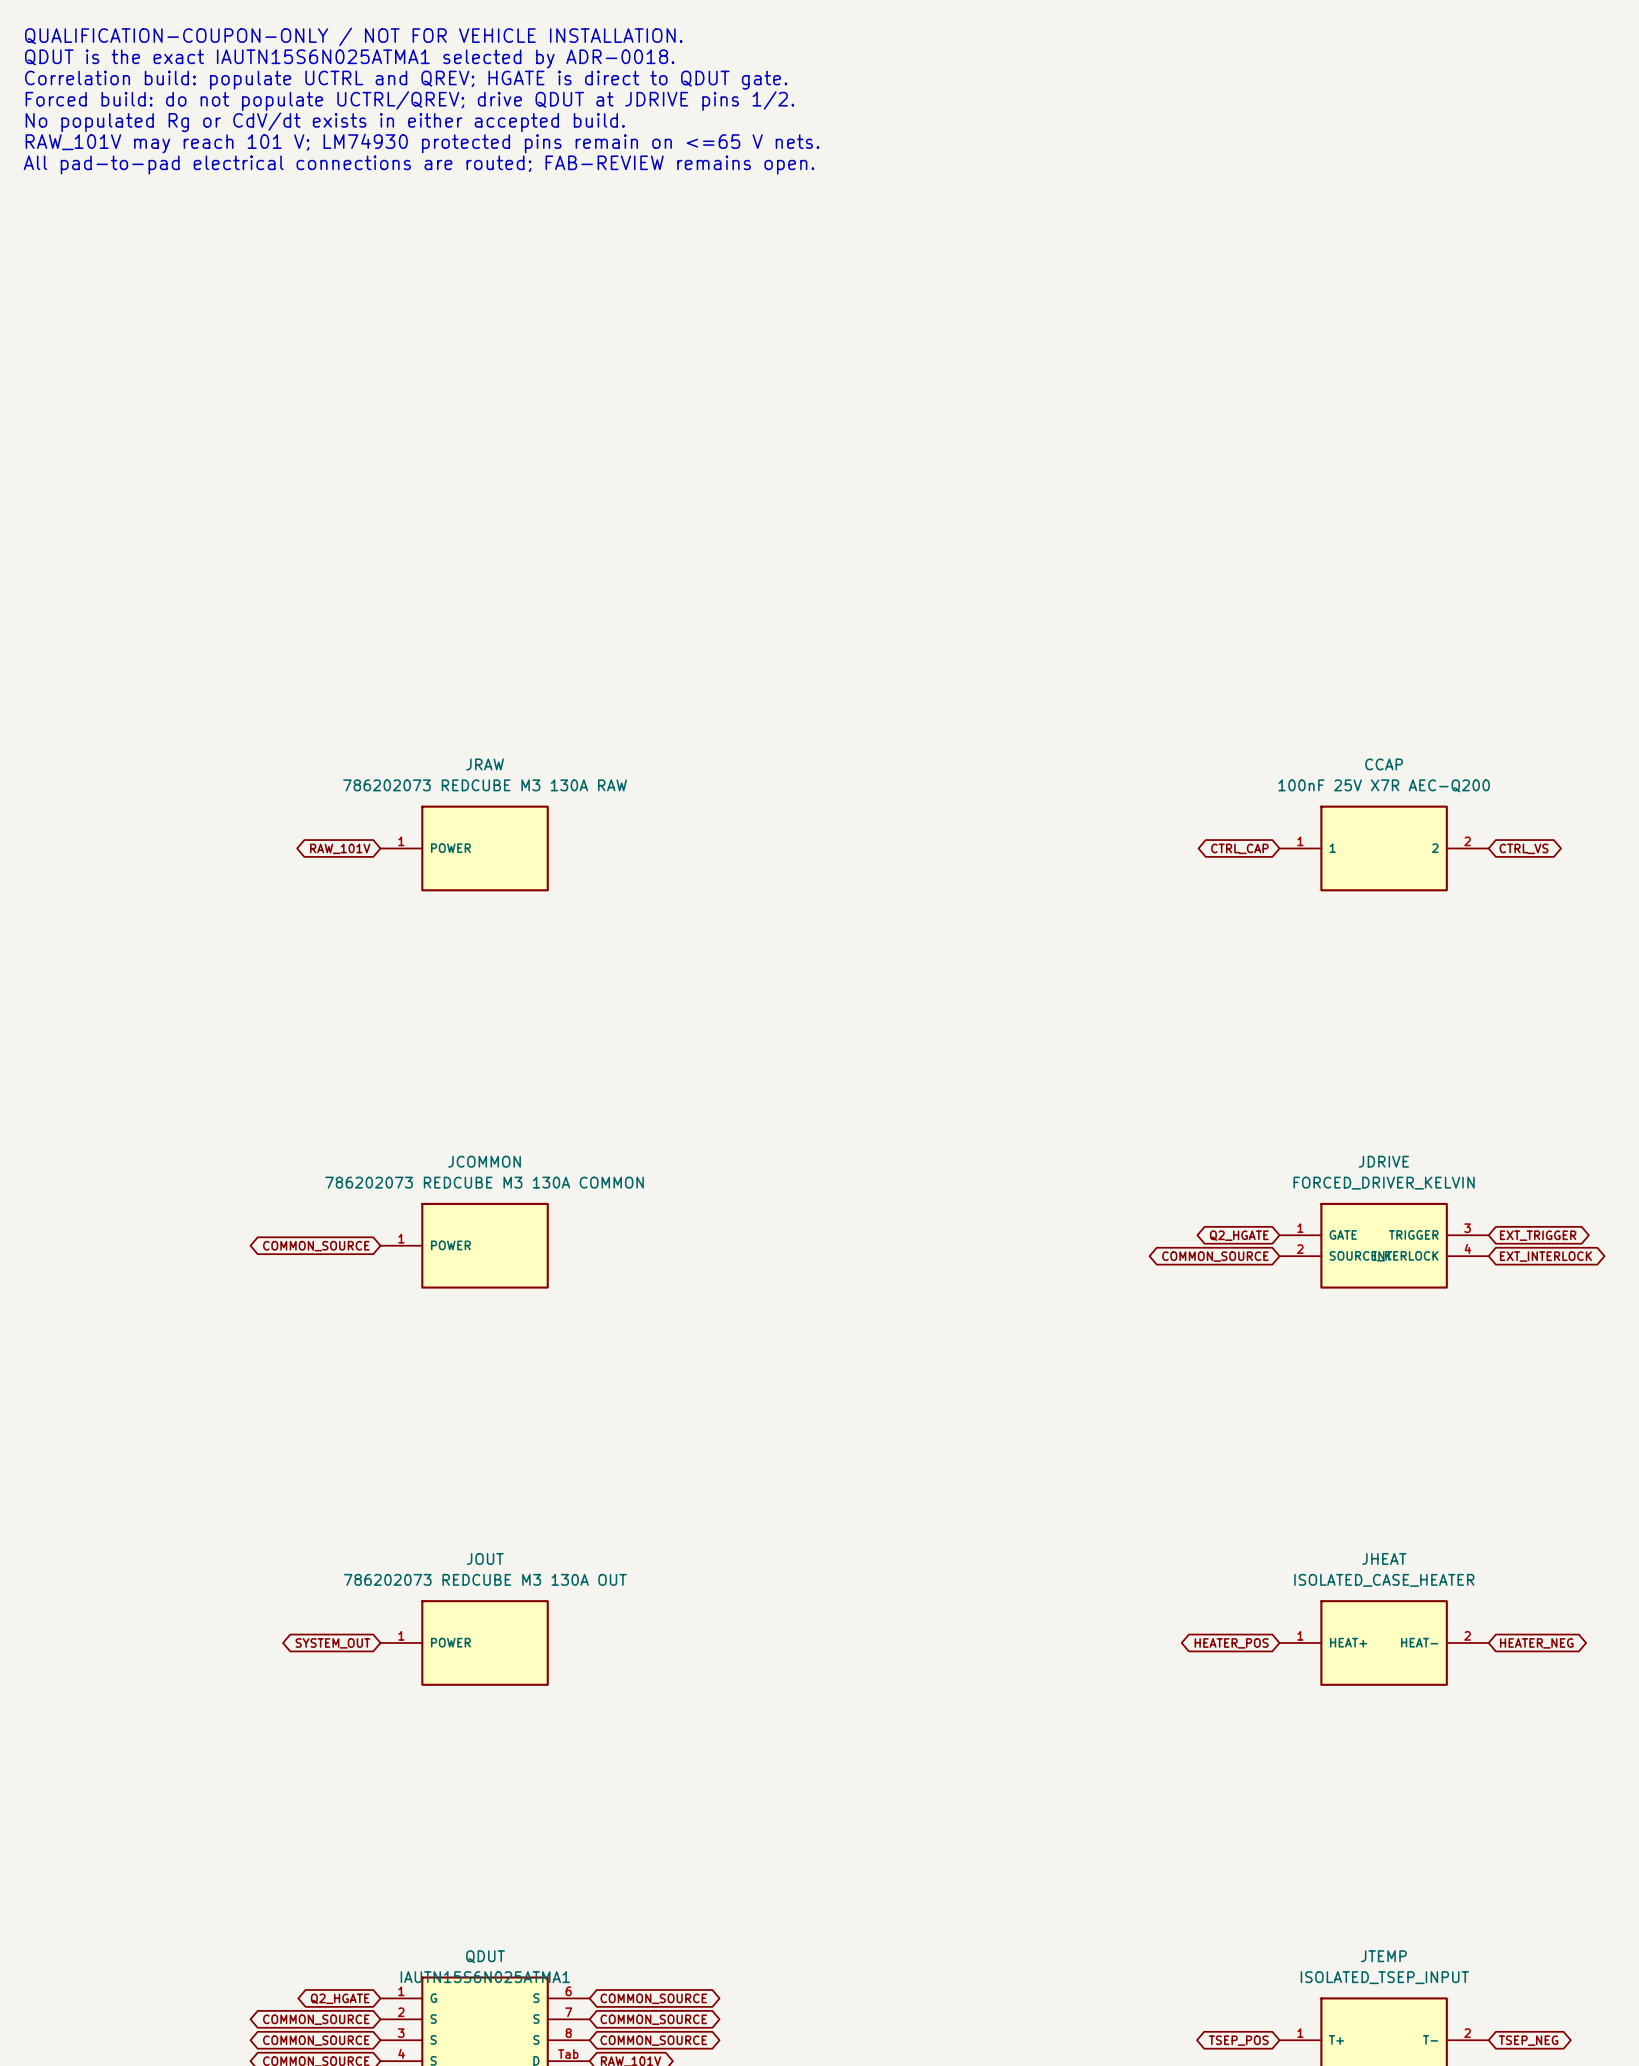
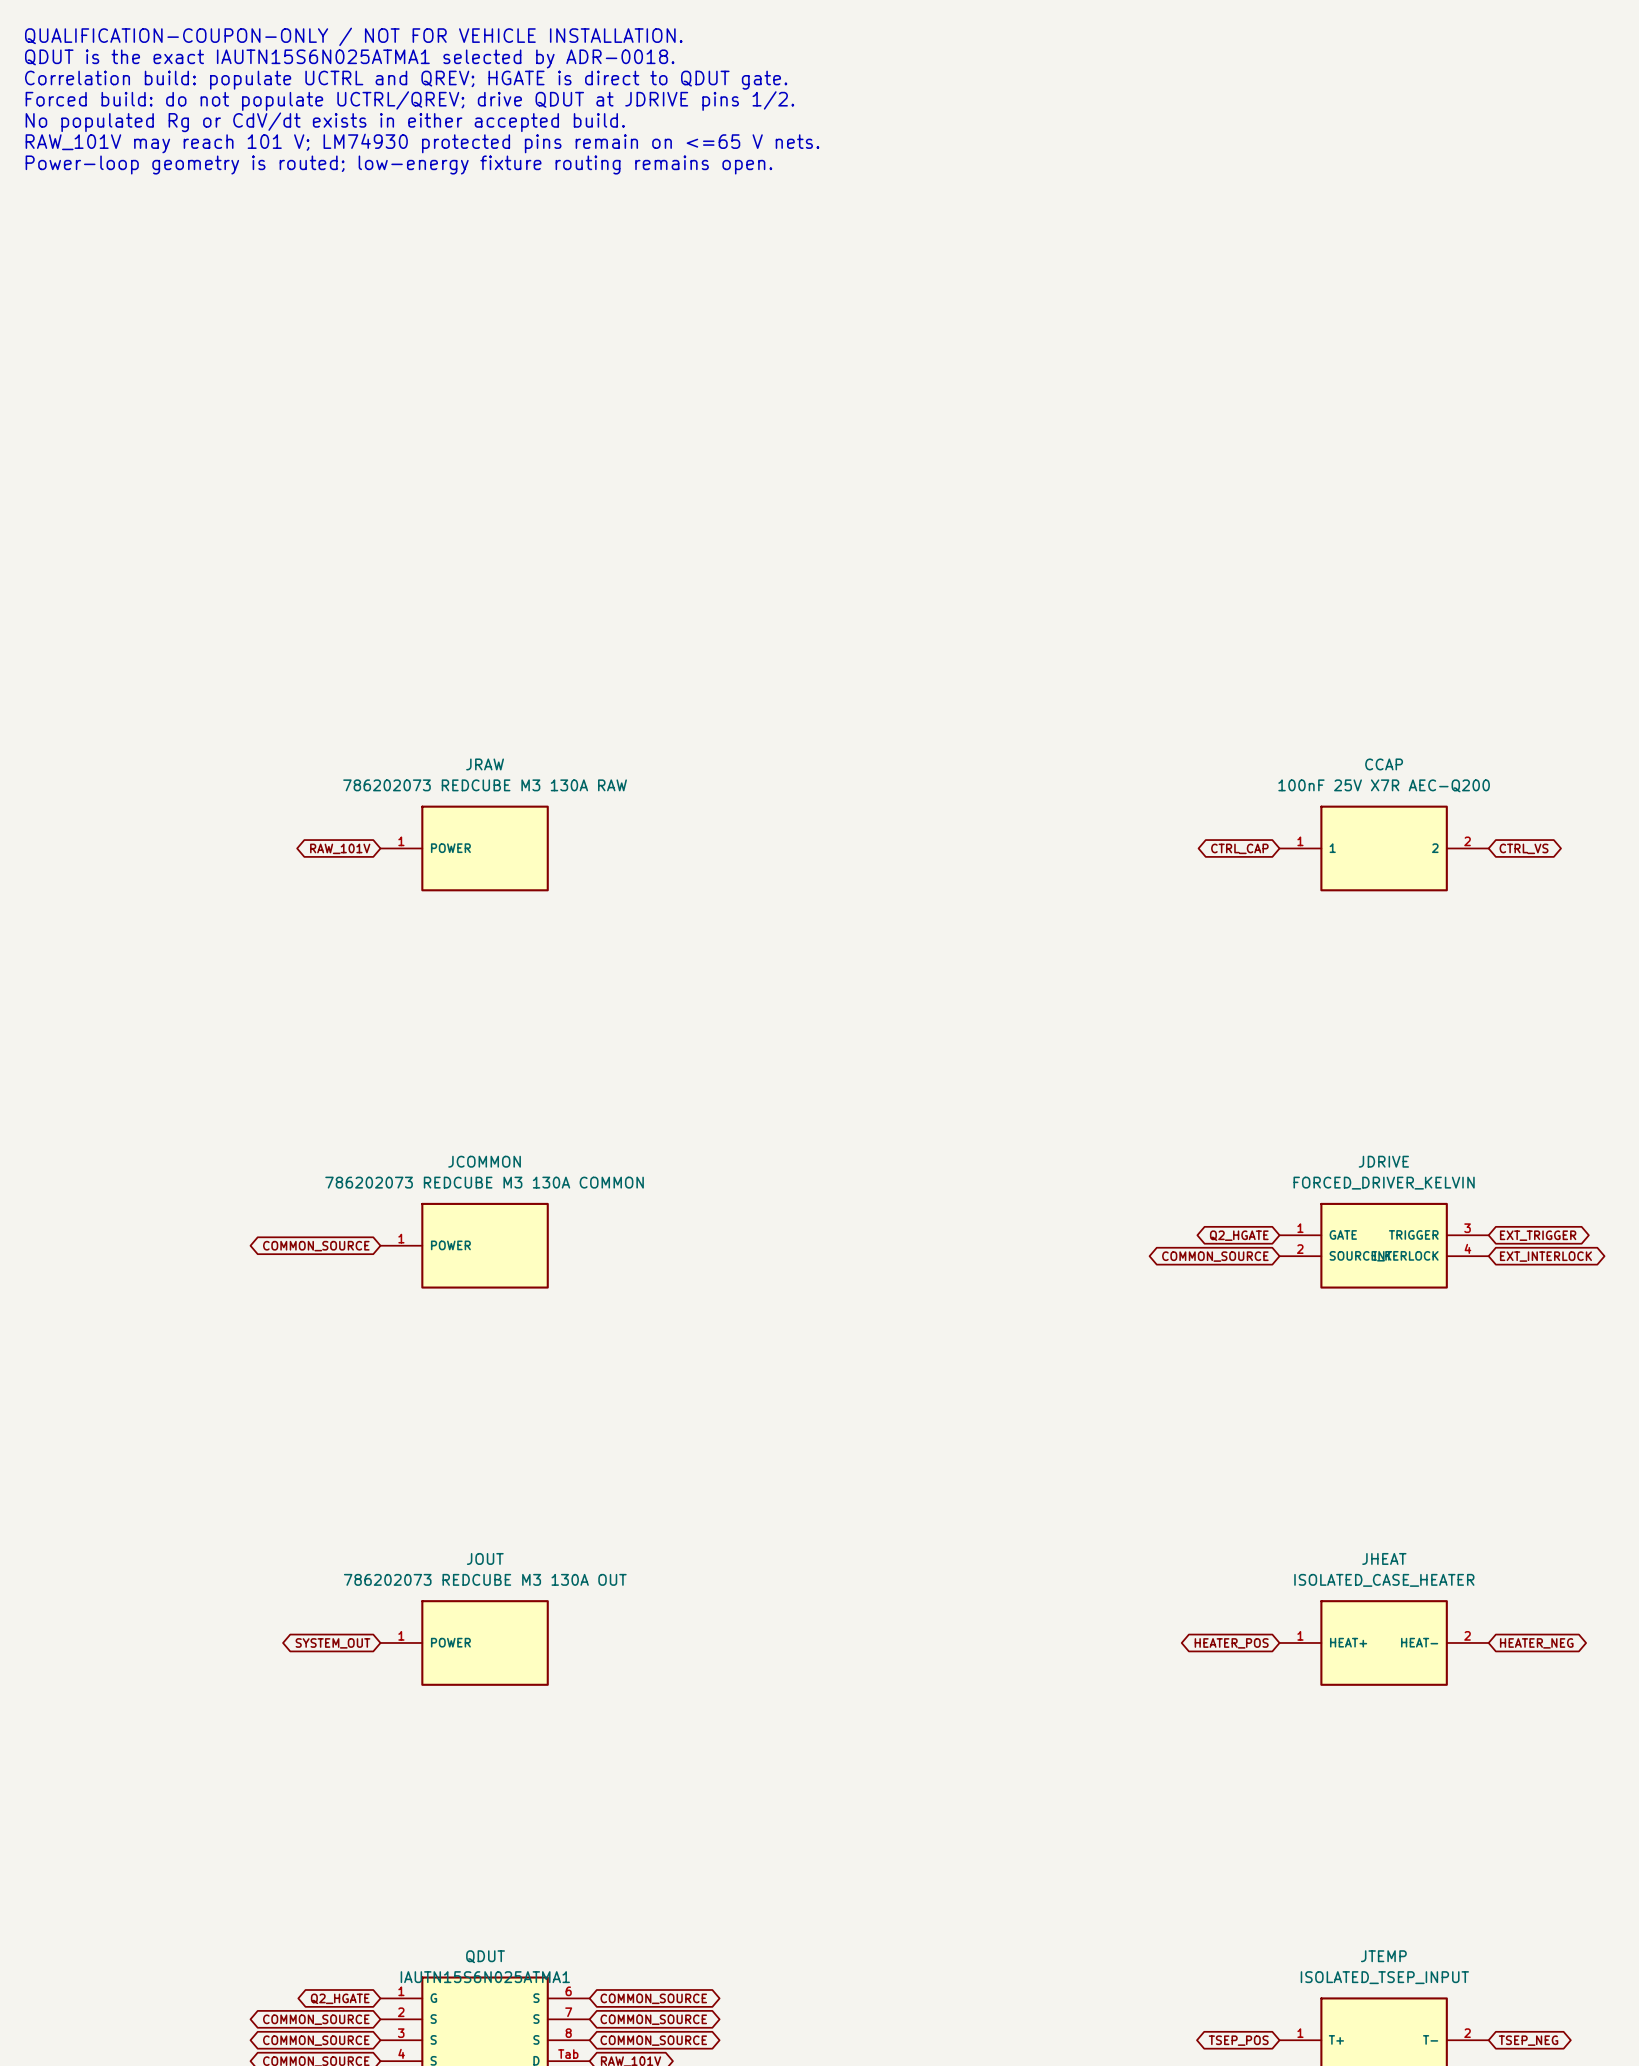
text: All pad-to-pad electrical connections are routed; FAB-REVIEW remains open. (419, 164) -> Power-loop geometry is routed; low-energy fixture routing remains open. (398, 164)

